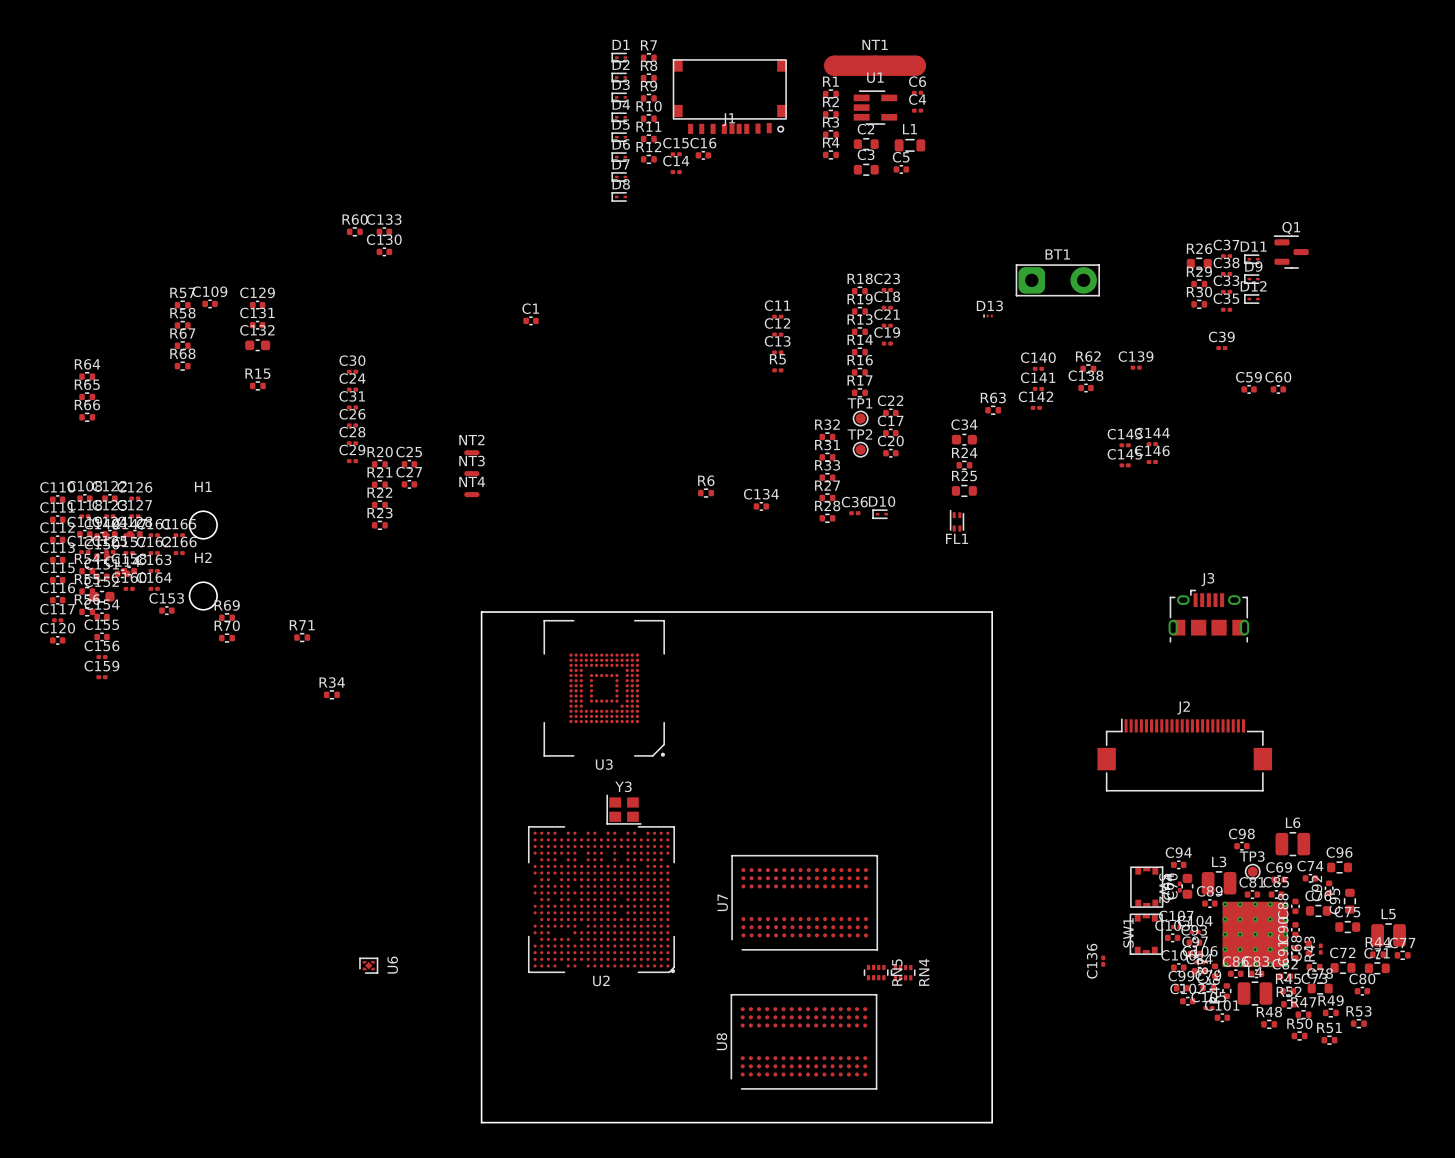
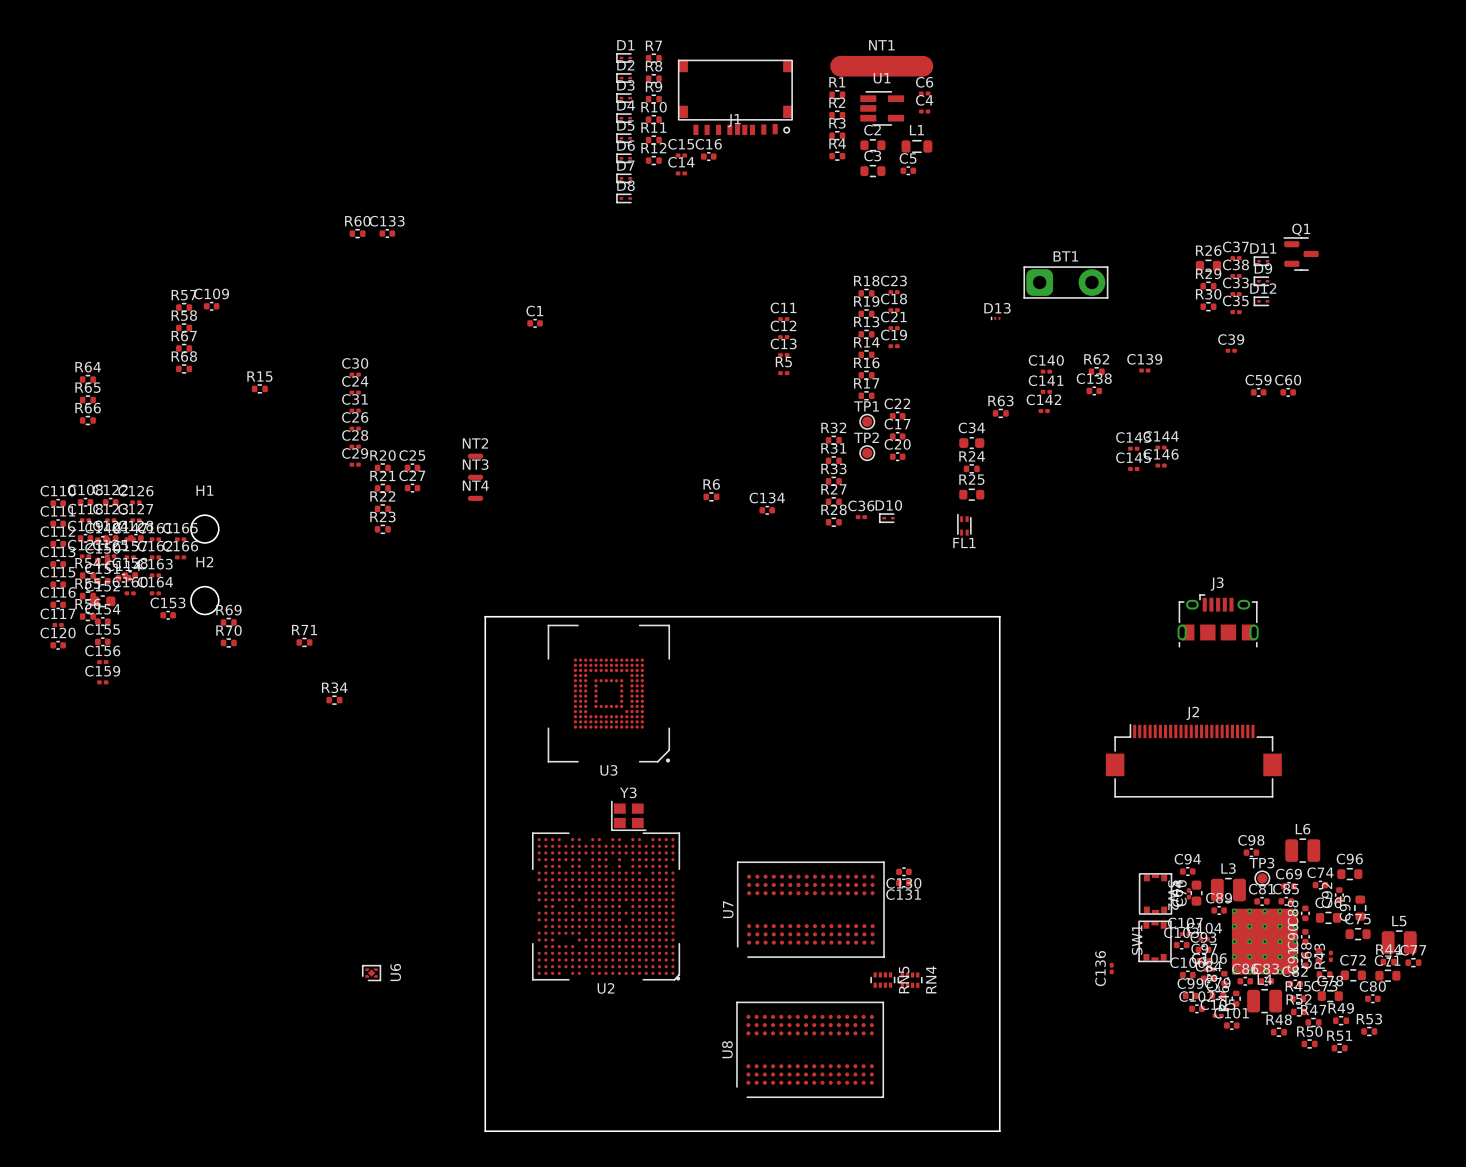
C130 name position: C130 (384, 239) -> C130 (903, 883)
C130 position: (384, 251) -> (903, 871)
C129: (257, 305) -> none
C131 name position: C131 (257, 312) -> C131 (903, 894)
C131 position: (257, 325) -> (903, 883)
C132: (257, 345) -> none

